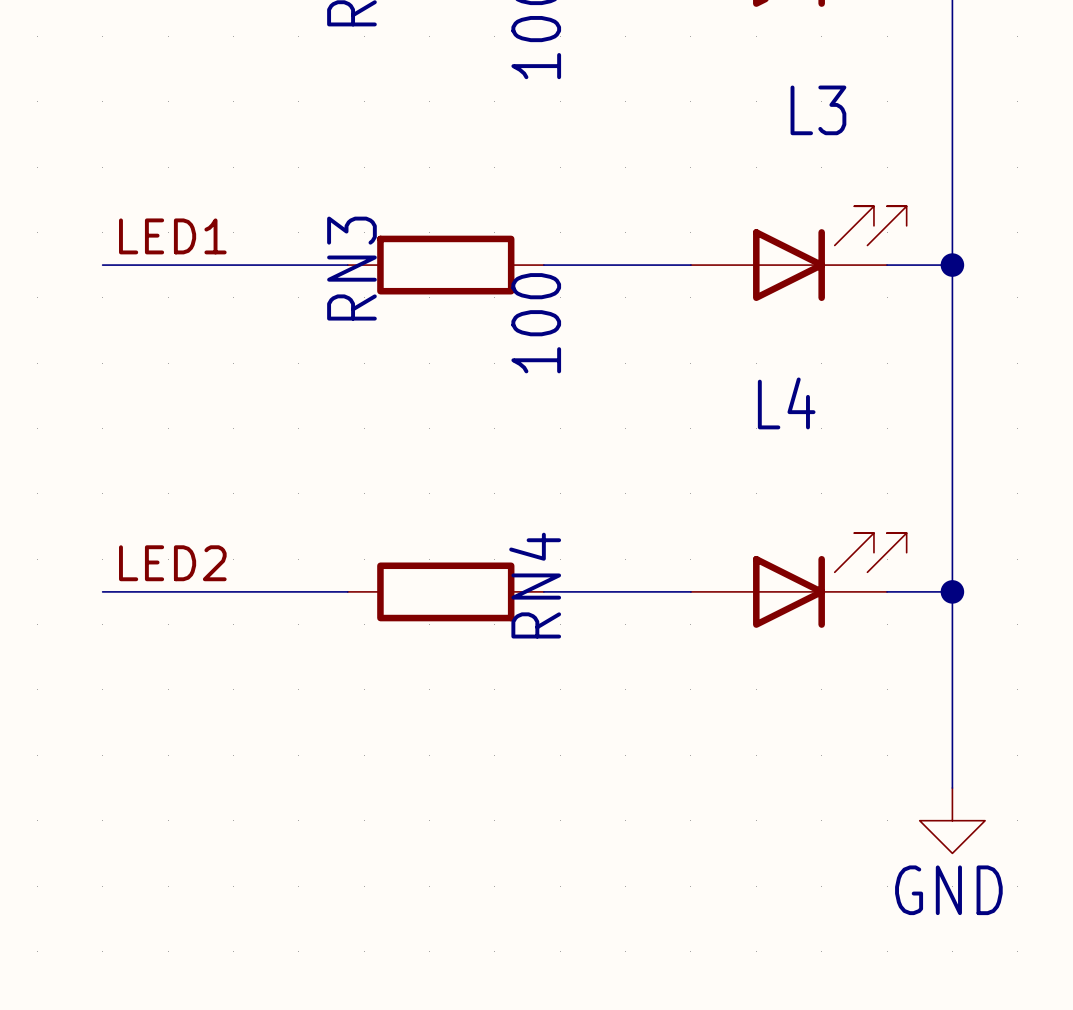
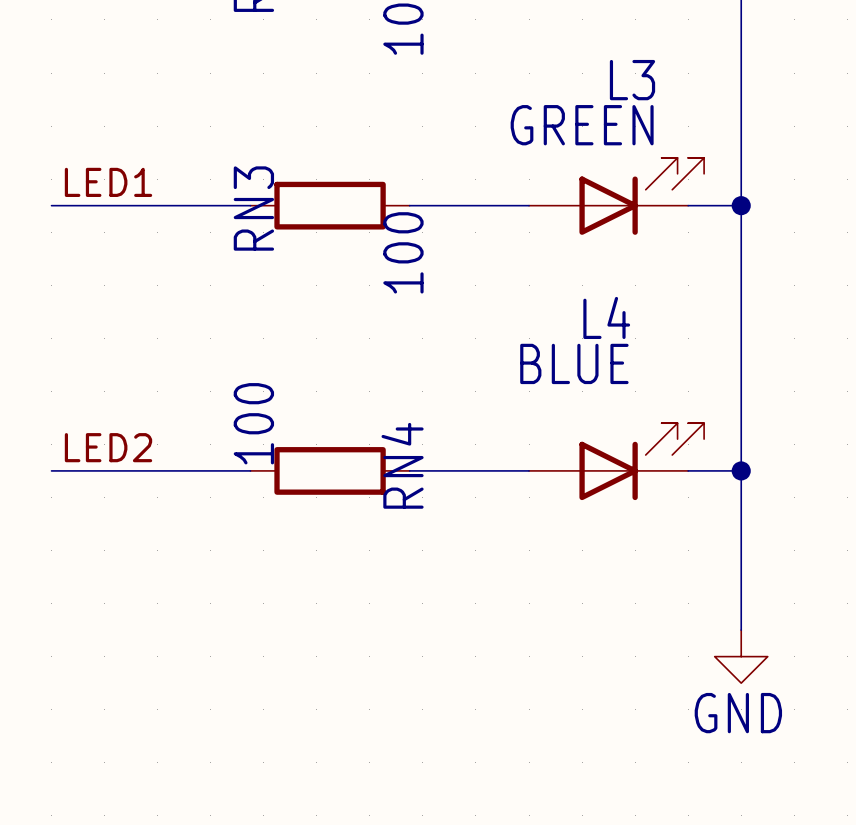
L3 value: none -> GREEN (582, 125)
L4 value: none -> BLUE (574, 363)
RN4 value: none -> 100 (253, 423)

